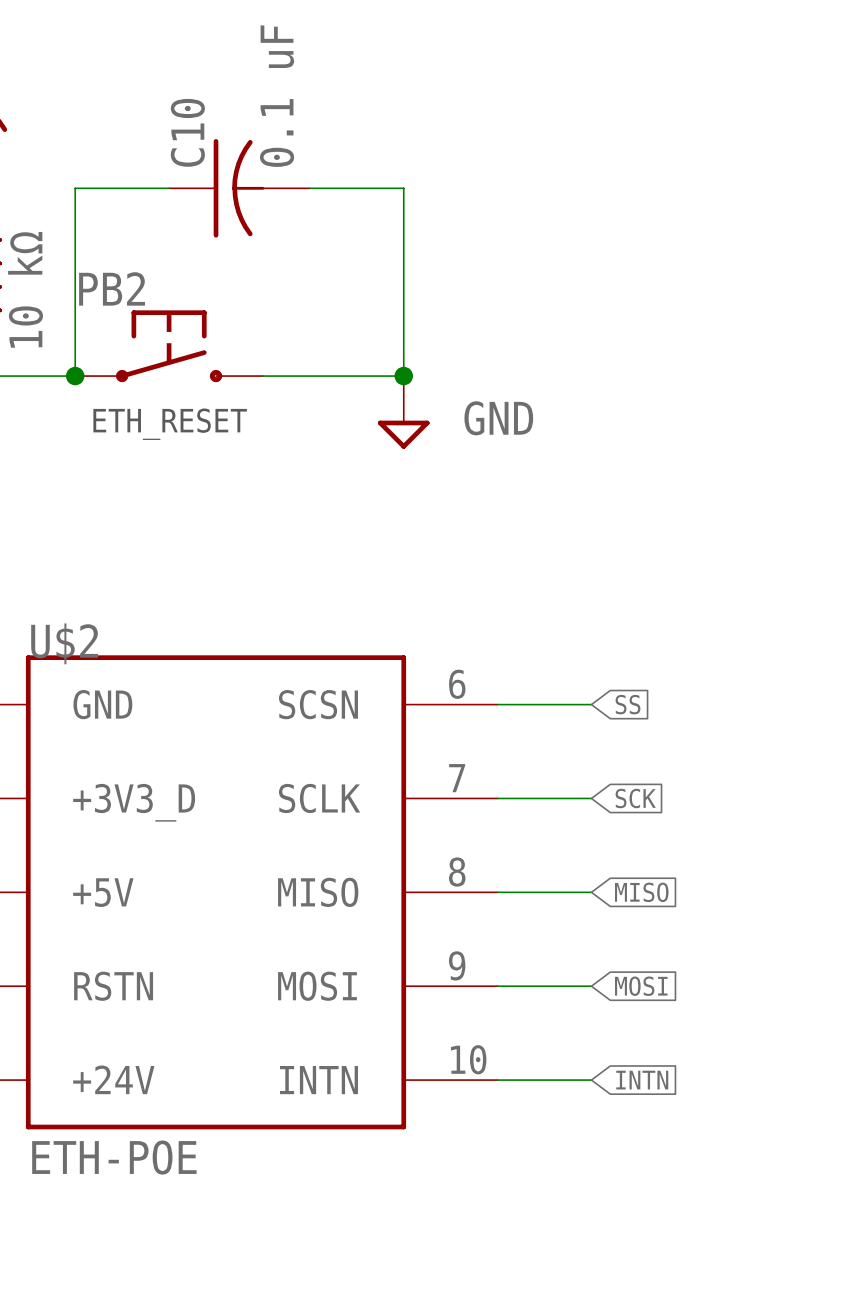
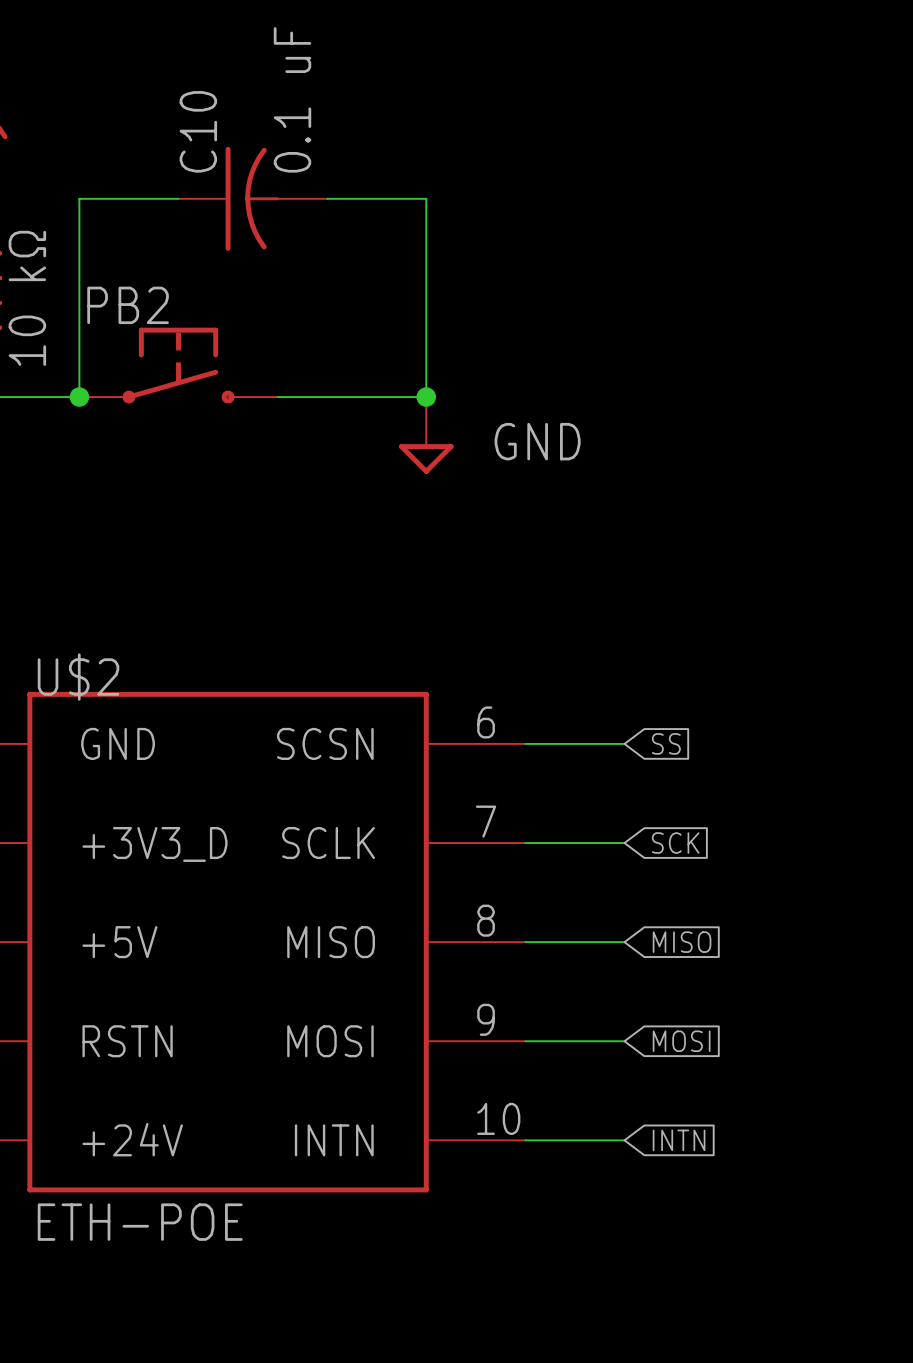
PB2 text: ETH_RESET (170, 424) -> none

